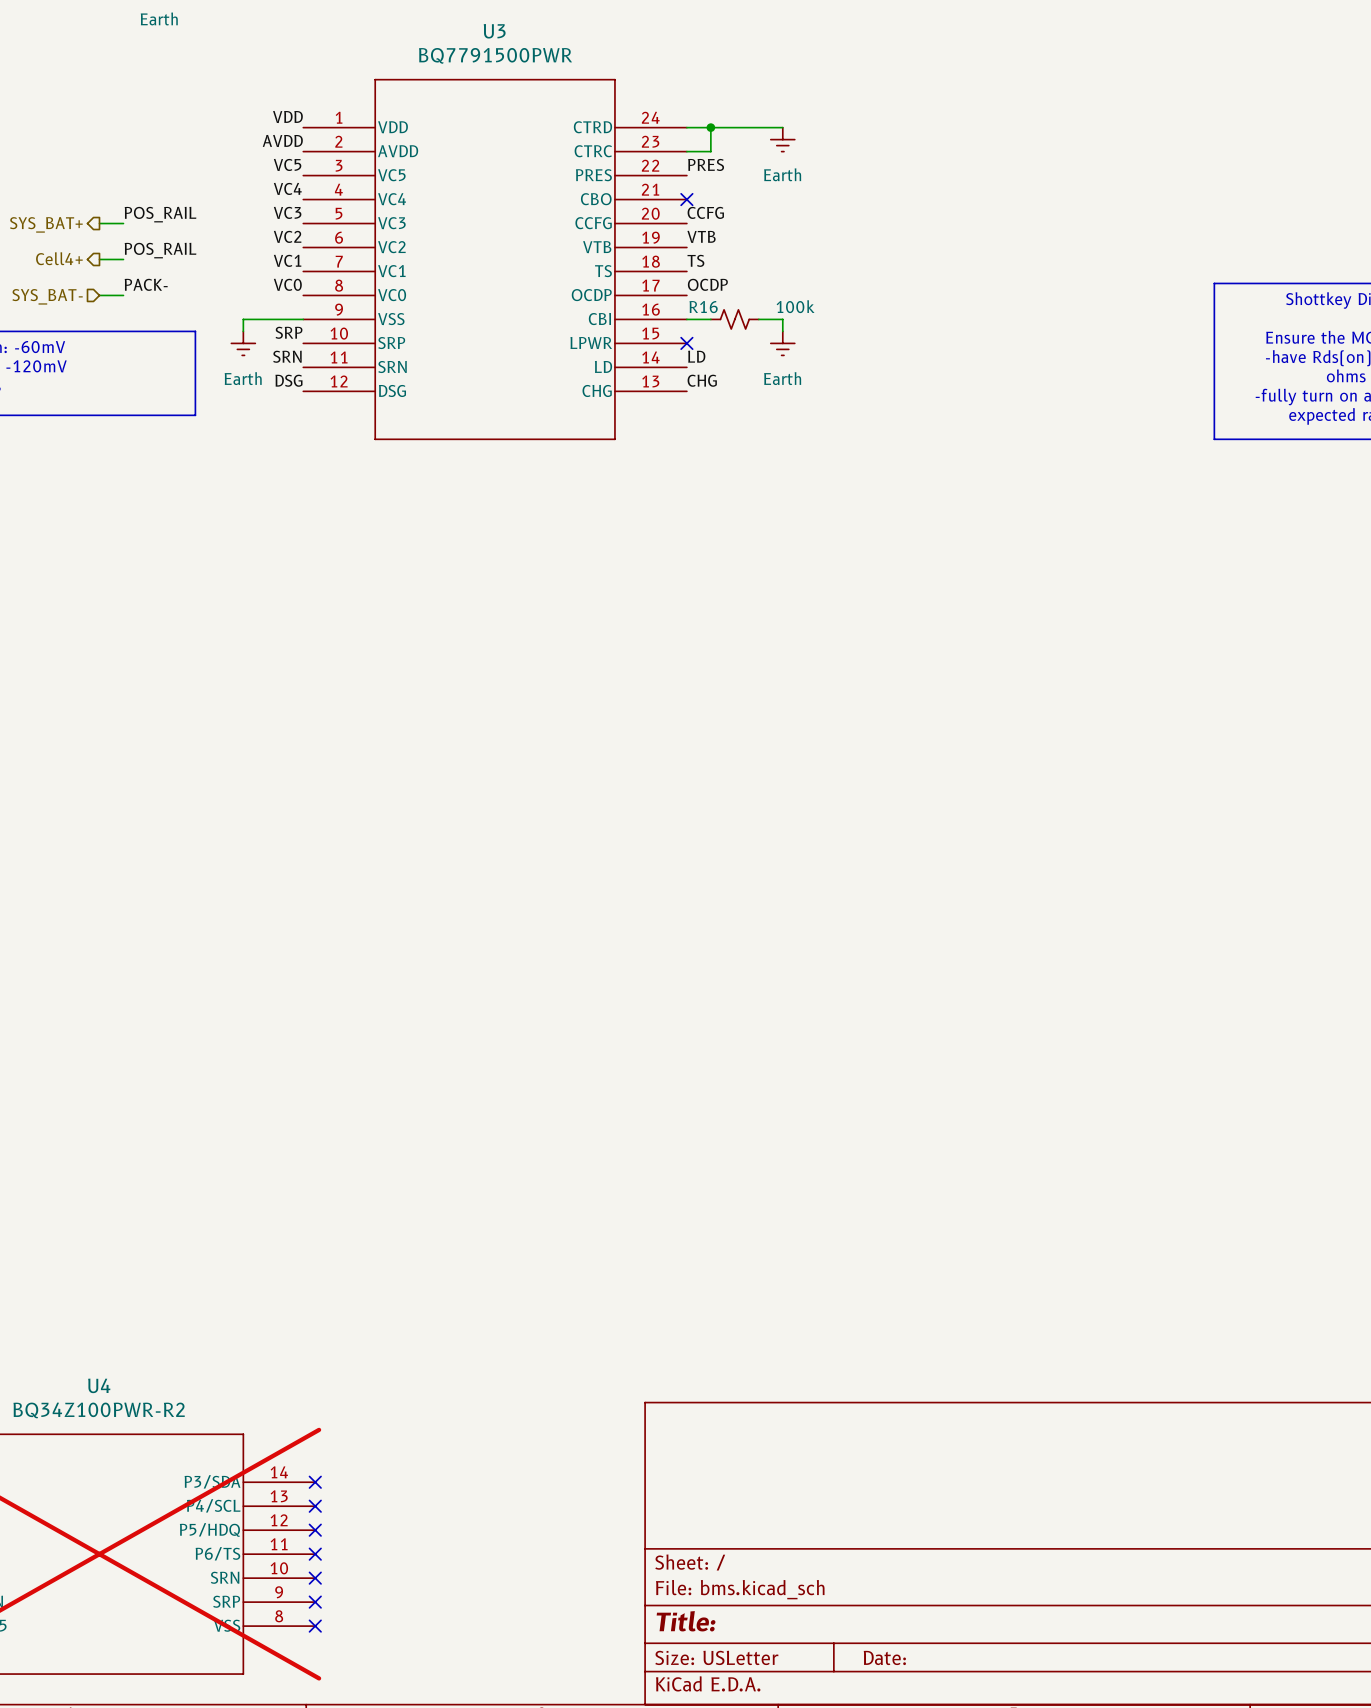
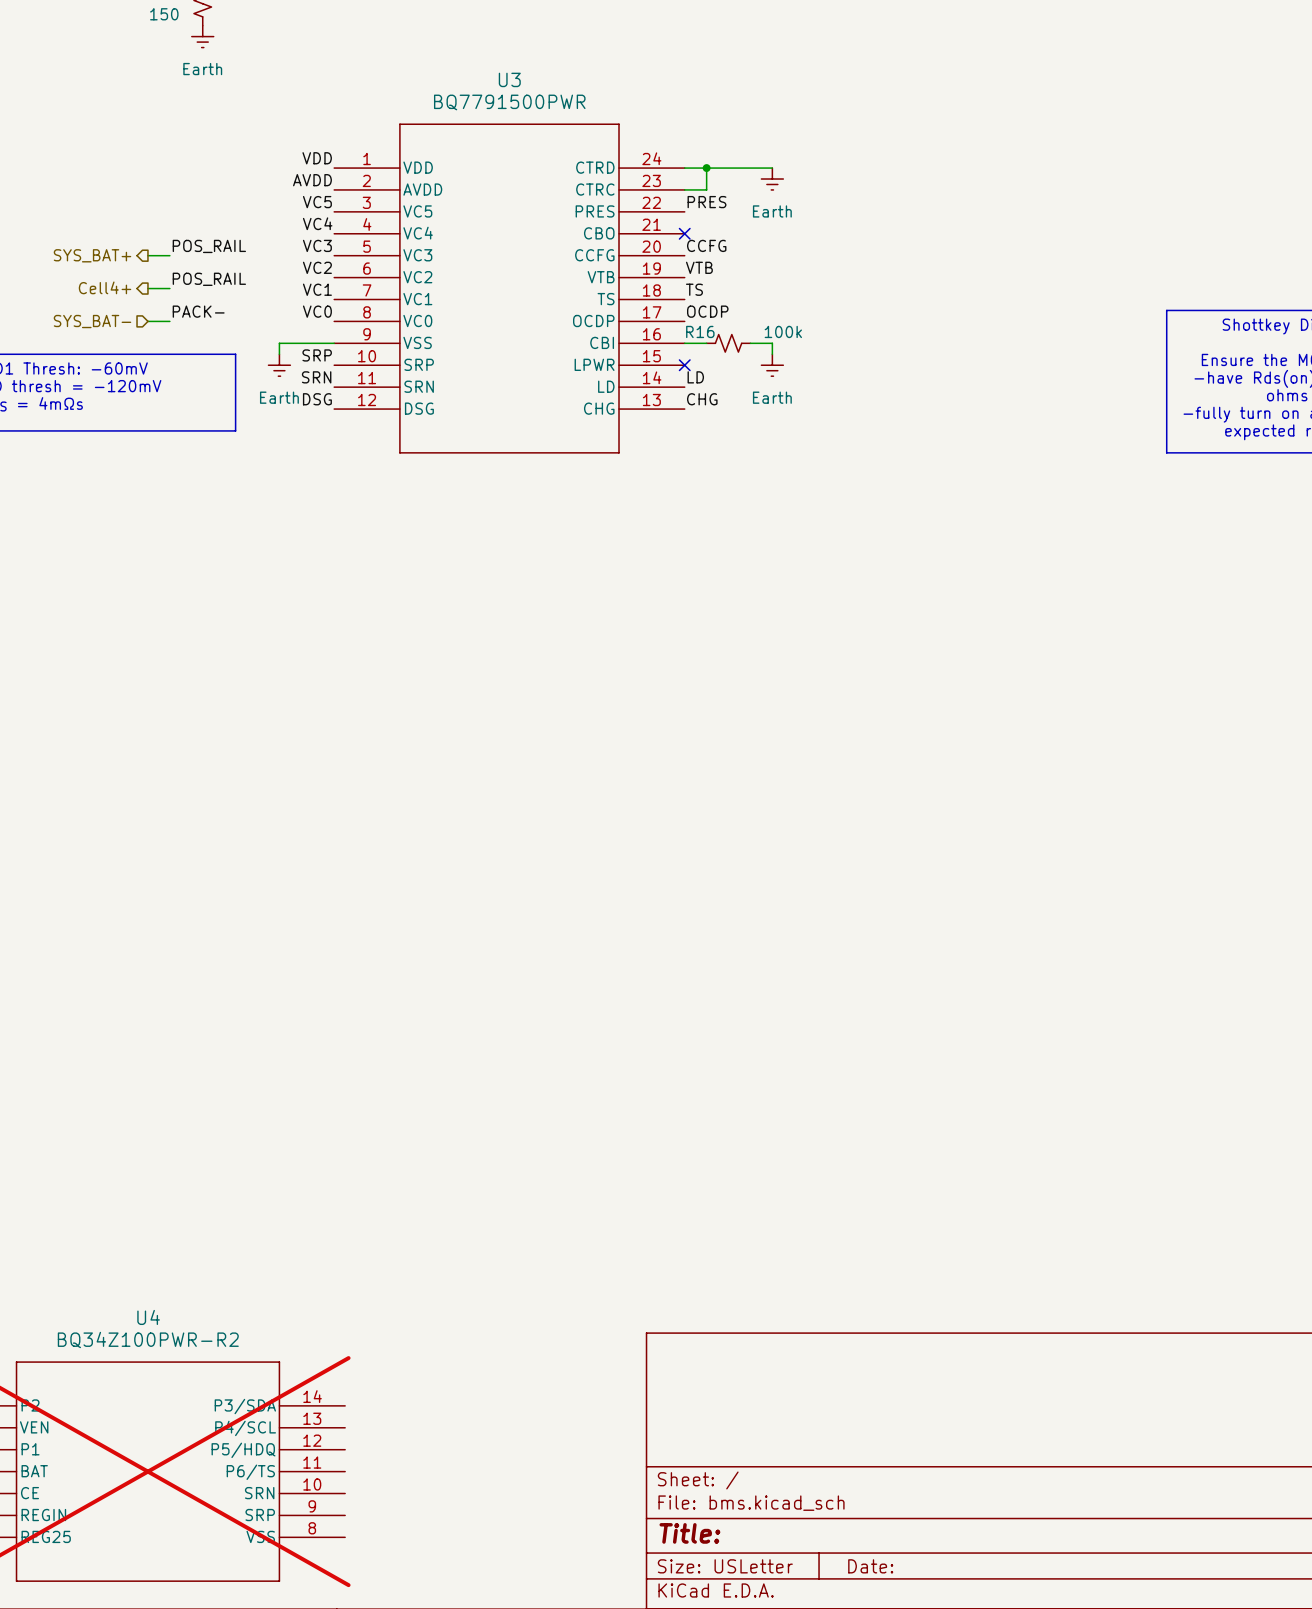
no-connect mark: (315, 1482) -> none
no-connect mark: (315, 1506) -> none
no-connect mark: (315, 1530) -> none
no-connect mark: (315, 1554) -> none
no-connect mark: (315, 1578) -> none
no-connect mark: (315, 1602) -> none
no-connect mark: (315, 1626) -> none

